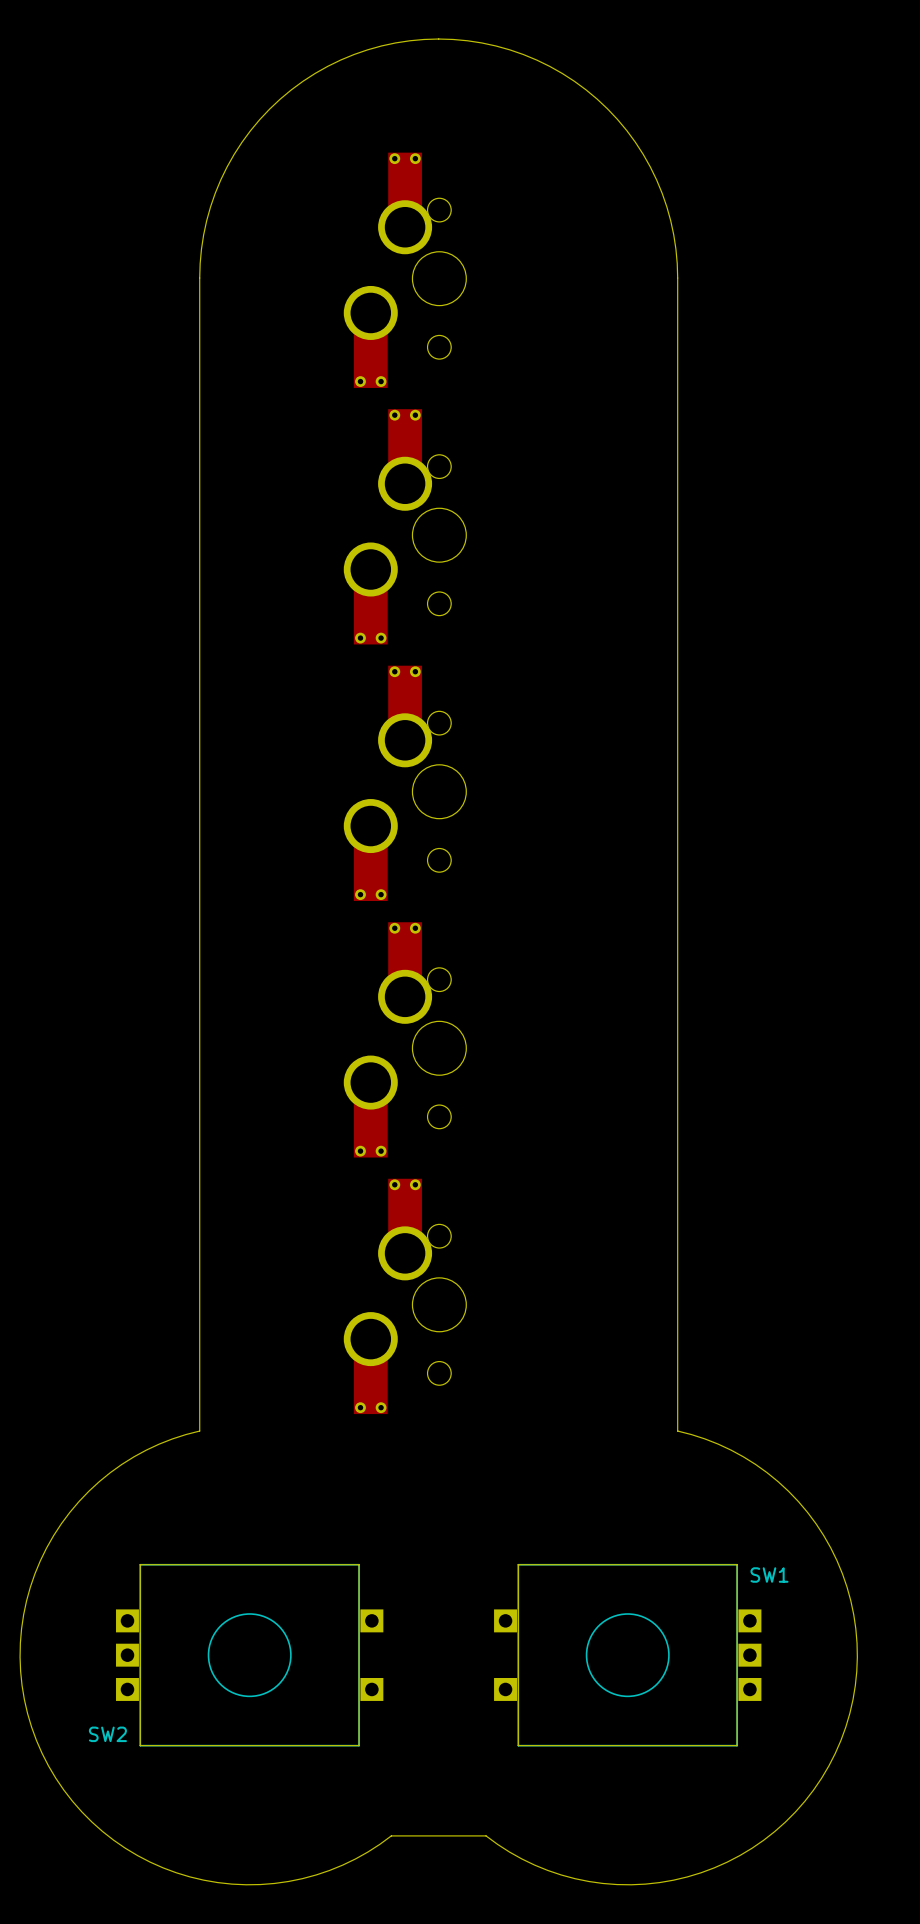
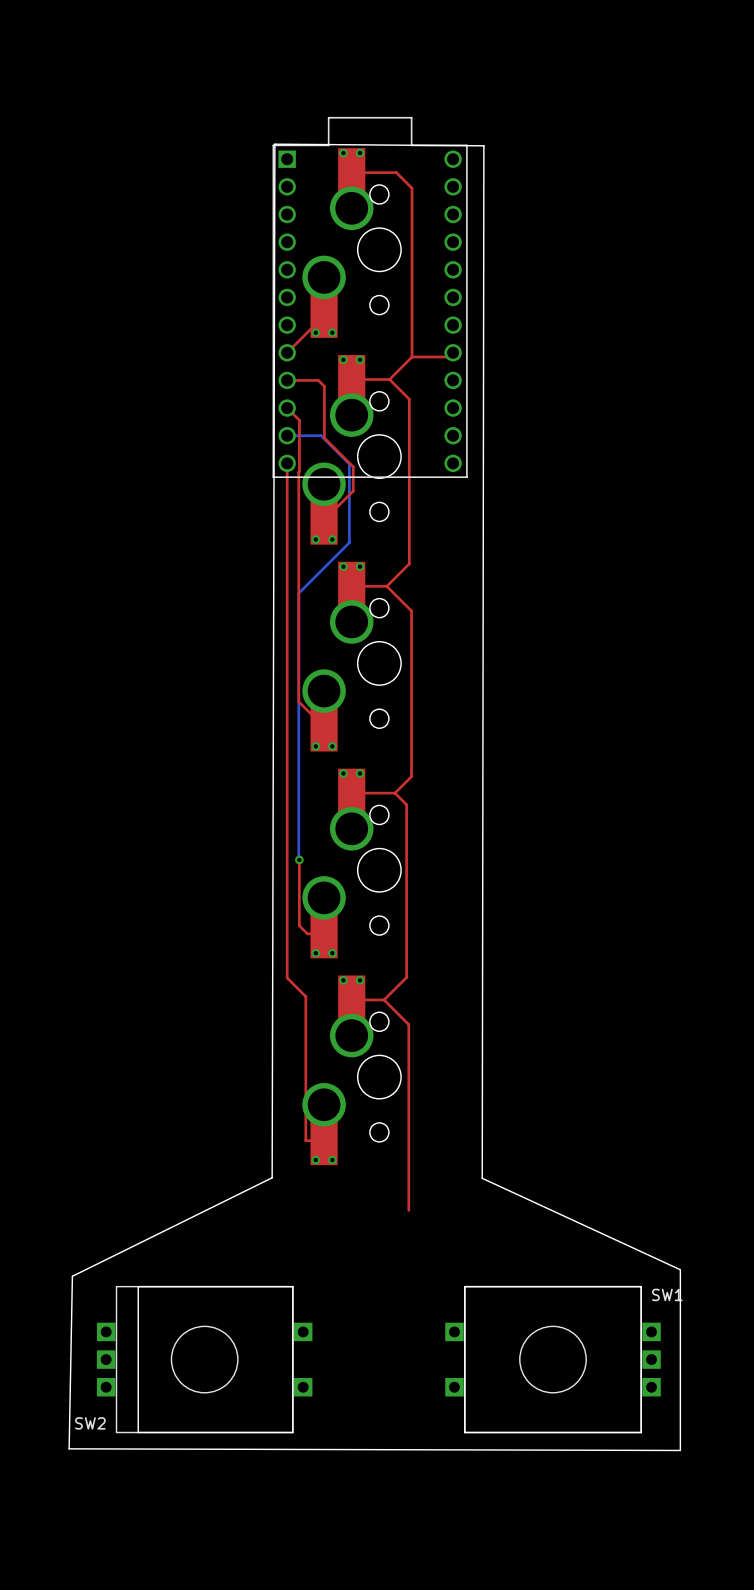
board edge: (438, 39) (395, 42) (367, 49) (327, 66) (291, 89) (269, 109) (242, 142) (220, 179) (206, 220) (201, 249) (199, 278) (199, 1431) (159, 1444) (133, 1456) (99, 1481) (79, 1501) (53, 1535) (40, 1560) (26, 1600) (21, 1628) (20, 1671) (27, 1713) (42, 1753) (63, 1790) (91, 1821) (125, 1848) (150, 1862) (176, 1872) (217, 1882) (260, 1884) (302, 1878) (329, 1870) (355, 1858) (391, 1835) (486, 1835) (509, 1852) (534, 1865) (561, 1874) (602, 1883) (631, 1884) (659, 1882) (701, 1872) (739, 1855) (763, 1840) (785, 1821) (804, 1801) (821, 1778) (840, 1740) (849, 1713) (855, 1685) (857, 1643) (850, 1600) (837, 1560) (816, 1523) (788, 1491) (755, 1464) (718, 1444) (677, 1431) (677, 278) (675, 249) (670, 220) (656, 179) (643, 154) (617, 119) (586, 89) (562, 73) (523, 54) (481, 42) (438, 39) -> (274, 144) (272, 1177) (72, 1276) (69, 1448) (680, 1450) (680, 1269) (482, 1178) (483, 145) (274, 144)
top track: none -> (351, 172) (396, 172) (412, 188) (412, 357)
part: none -> (370, 297)
top track: none -> (324, 313) (324, 315) (287, 352)
top track: none -> (453, 352) (448, 357) (412, 357)
top track: none -> (412, 357) (389, 379)
top track: none -> (351, 379) (389, 379)
top track: none -> (389, 379) (409, 399) (409, 563) (386, 586)
top track: none -> (287, 380) (318, 380) (324, 386) (324, 438) (353, 466) (353, 491) (324, 520)
top track: none -> (287, 408) (299, 420) (298, 701) (324, 727)
bottom track: none -> (287, 435) (321, 435) (349, 463) (349, 542) (298, 593) (299, 859)
top track: none -> (287, 463) (287, 977) (305, 996) (305, 1140) (324, 1140)
top track: none -> (351, 586) (386, 586)
top track: none -> (386, 586) (411, 610) (411, 776) (395, 793)
top track: none -> (351, 793) (395, 793)
top track: none -> (395, 793) (406, 804) (406, 977) (384, 999)
top track: none -> (299, 859) (299, 925) (307, 933) (324, 933)
via: none -> (299, 859)
top track: none -> (351, 999) (384, 999)
top track: none -> (384, 999) (408, 1024) (408, 1210)
board edge: (332, 1564) (359, 1564) (359, 1745) (332, 1745) -> (292, 1286) (292, 1432)
board edge: (545, 1564) (518, 1564) (518, 1745) (545, 1745) -> (464, 1286) (464, 1432)
board edge: (737, 1564) (737, 1745) -> (619, 1286) (641, 1286) (641, 1432) (619, 1432)
SW2 position: (249, 1655) -> (204, 1359)
SW1 position: (627, 1655) -> (553, 1359)

